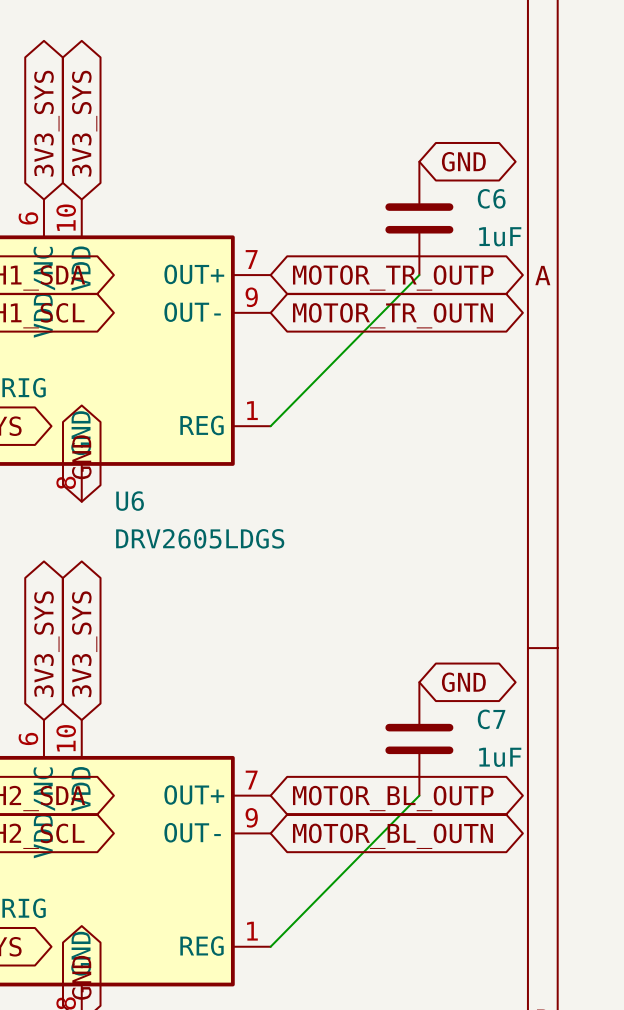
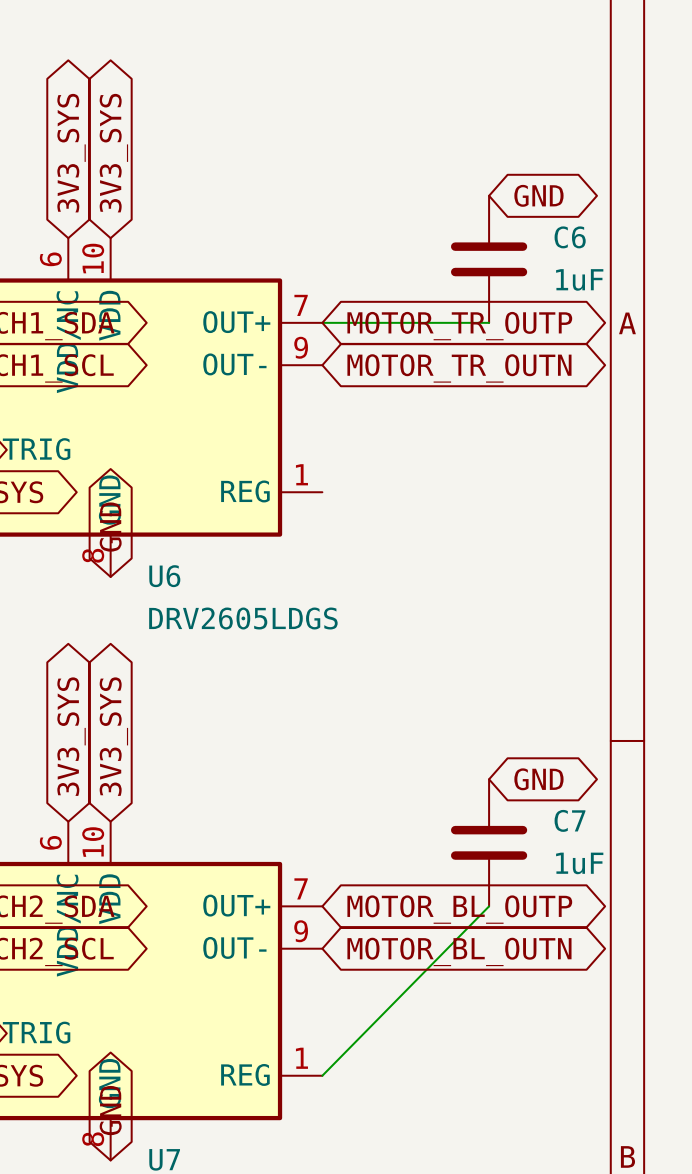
wire: (419, 275) (270, 426) -> (489, 322) (322, 322)

